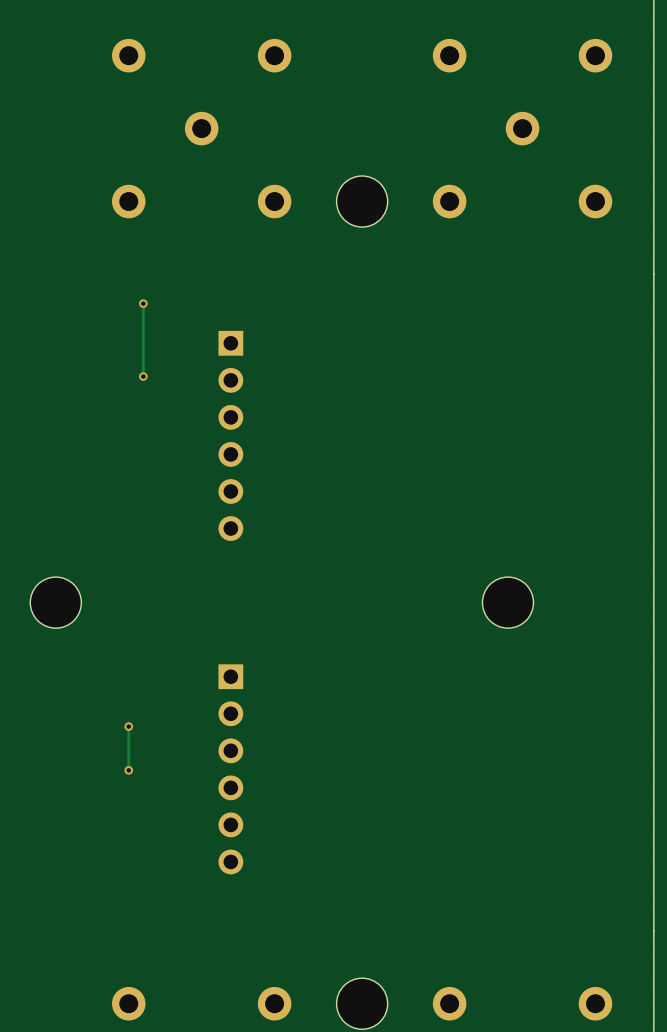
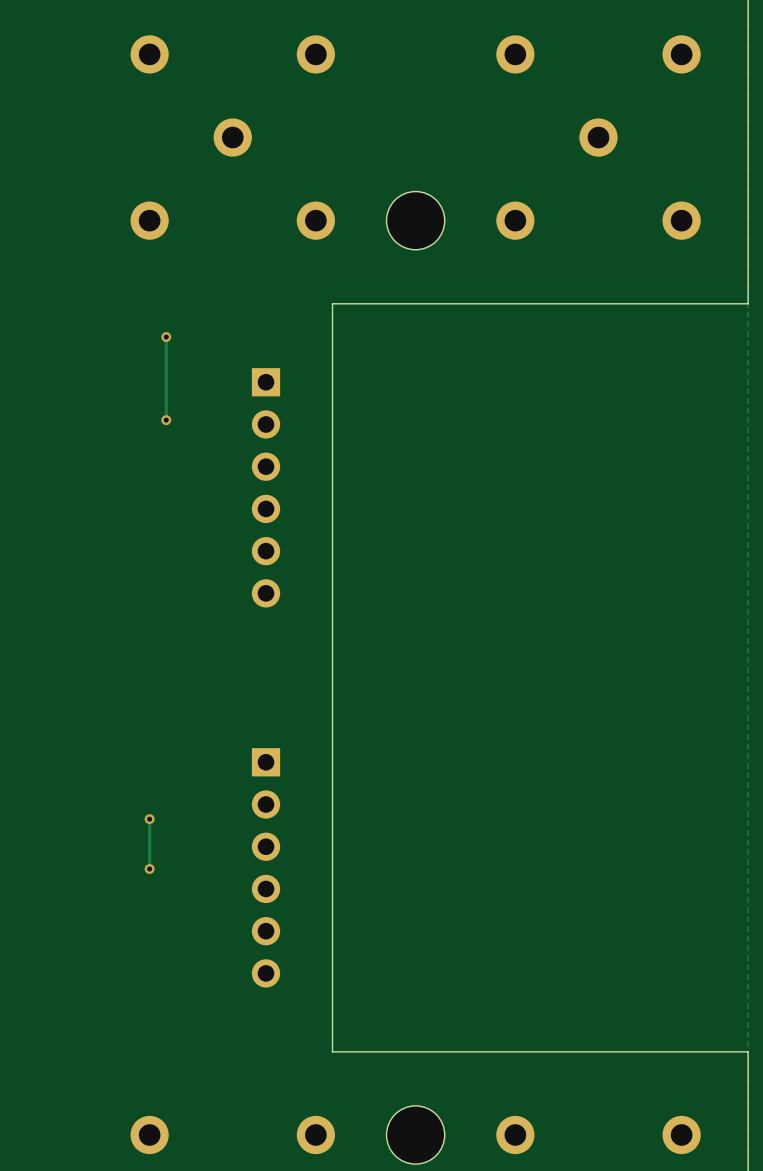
board edge: (653, 274) (653, 930) -> (748, 303) (332, 303) (332, 1051) (748, 1051)
part: (55, 602) -> none
part: (507, 602) -> none

